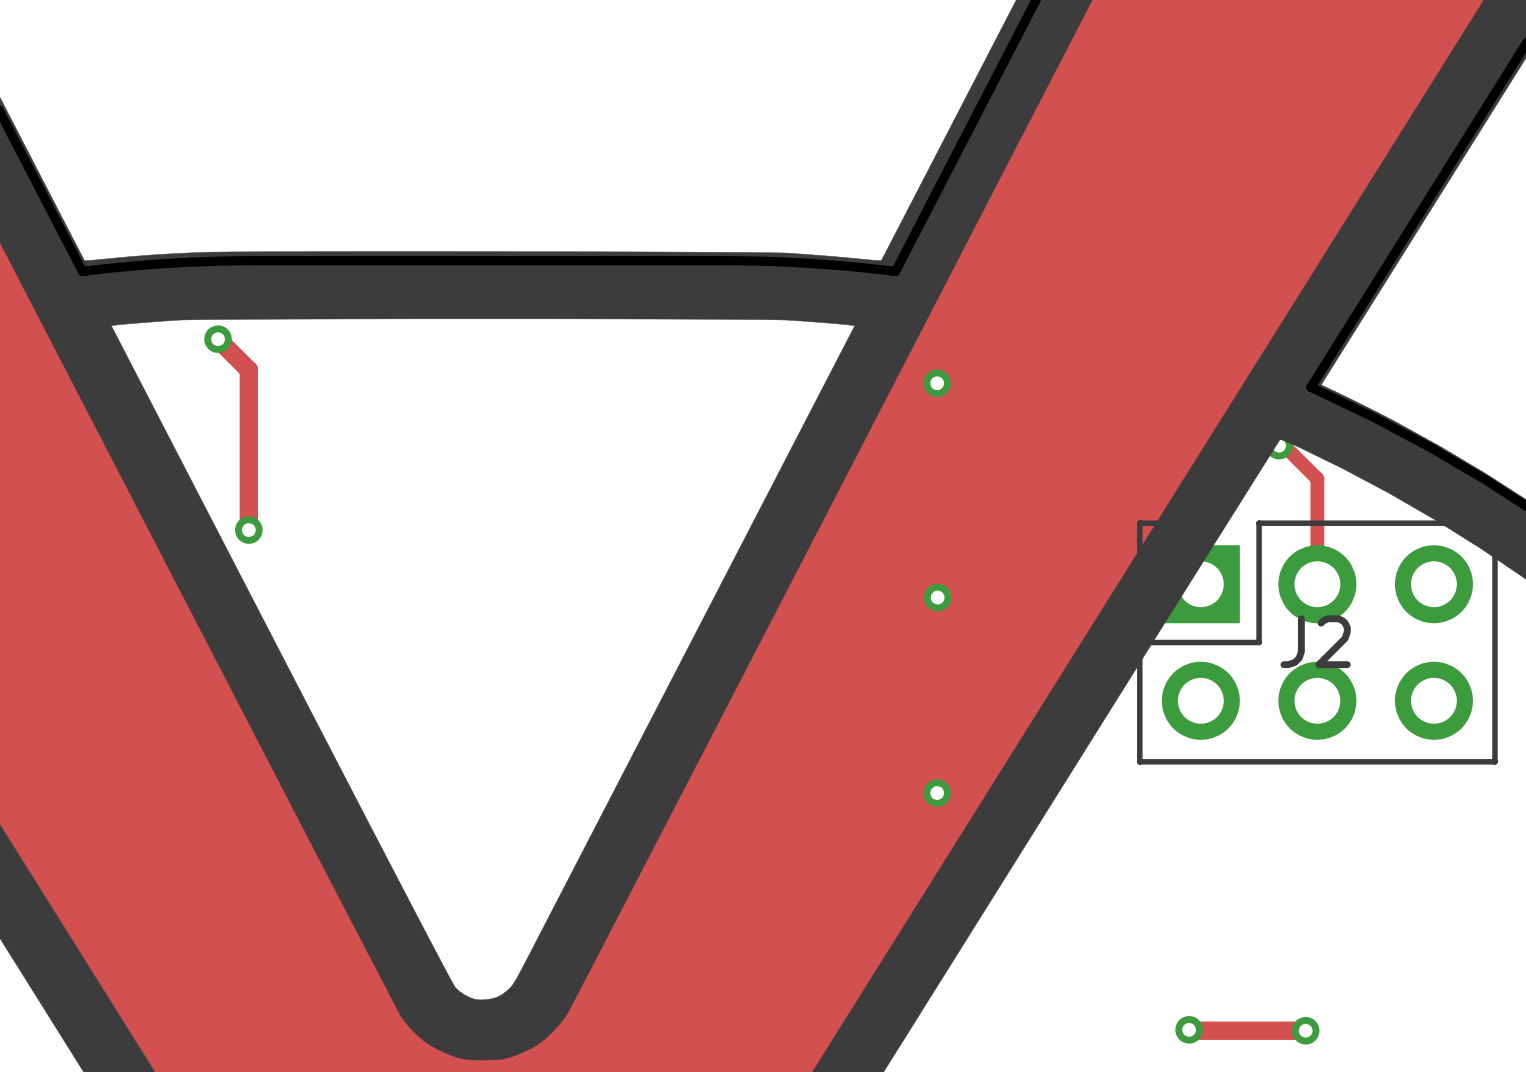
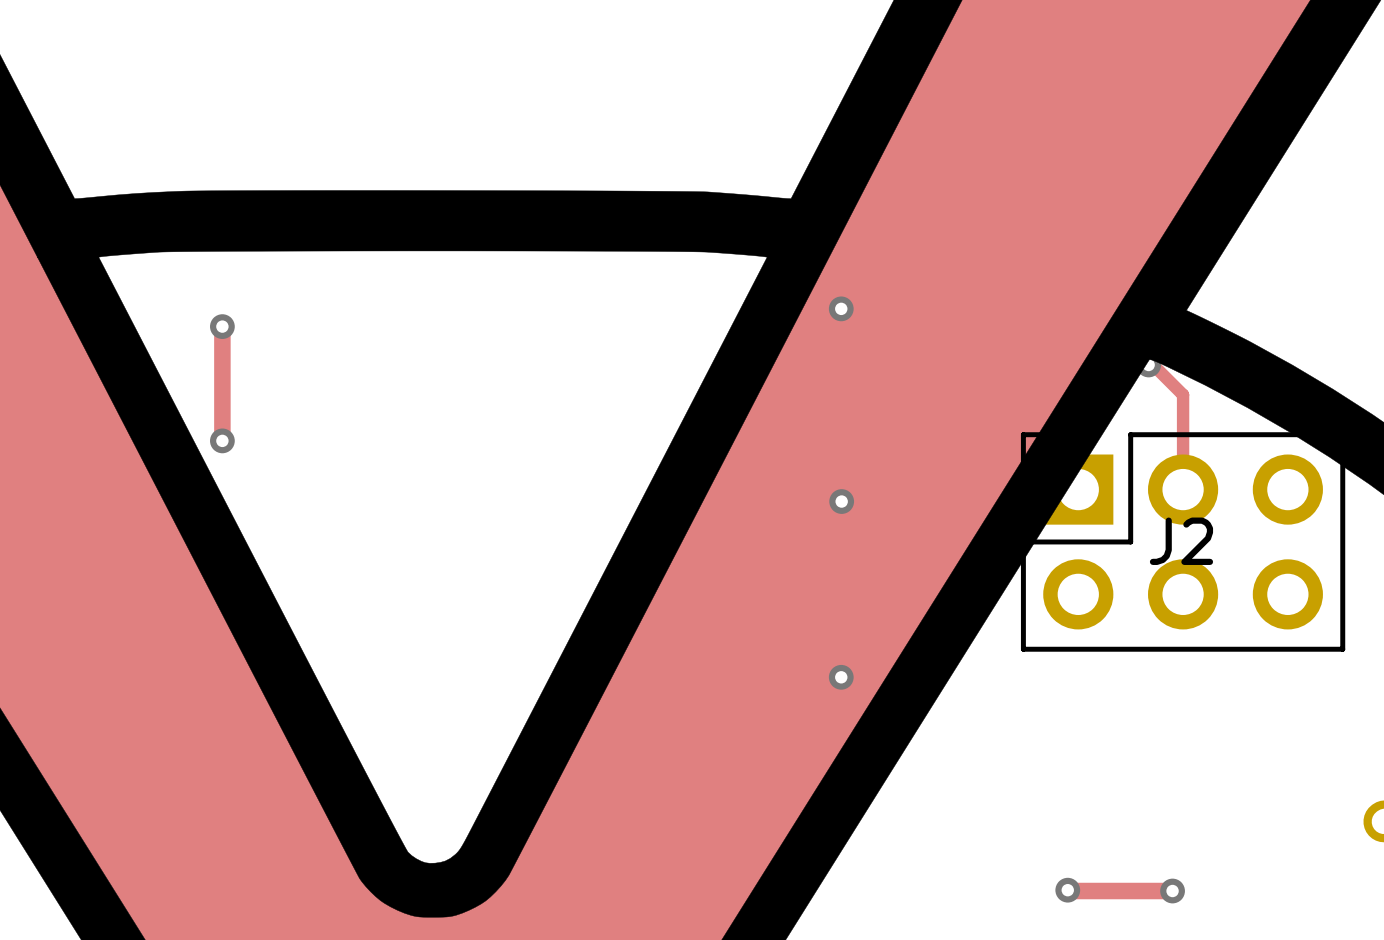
track: (218, 339) (248, 369) (248, 402) -> none
via position: (218, 339) -> (222, 326)

